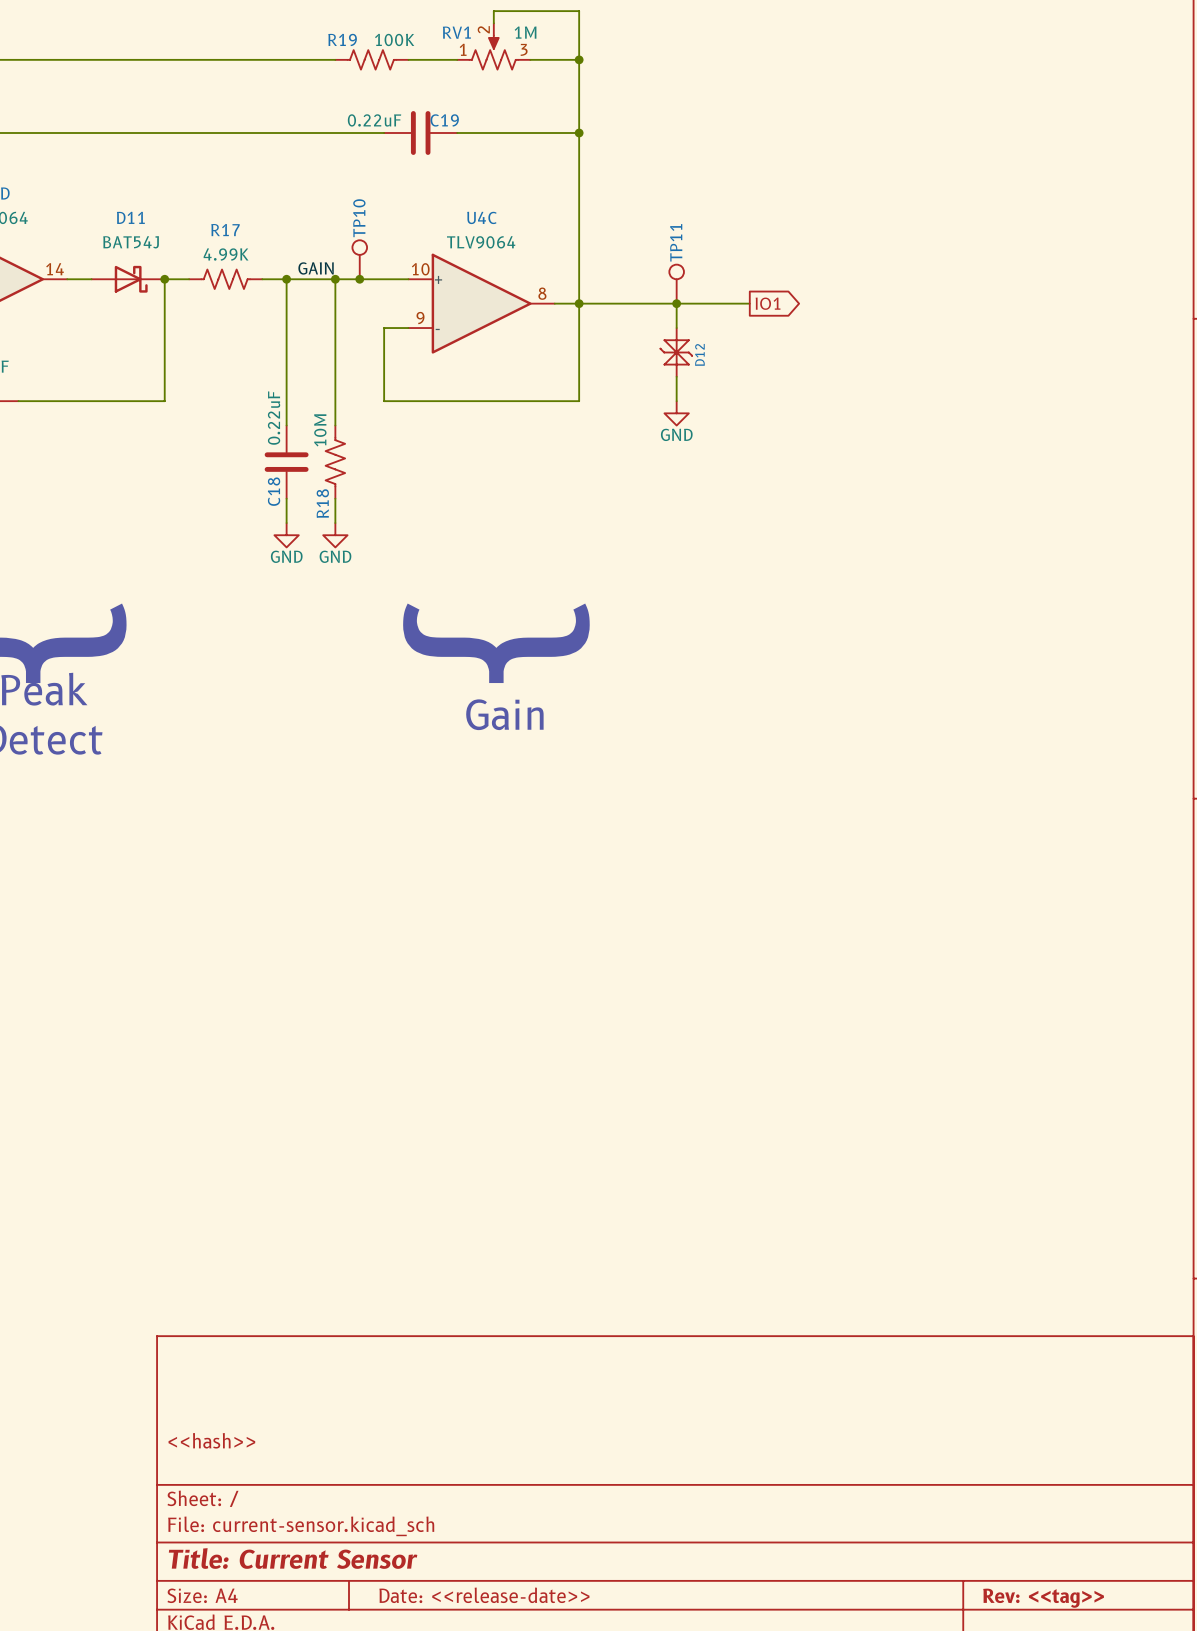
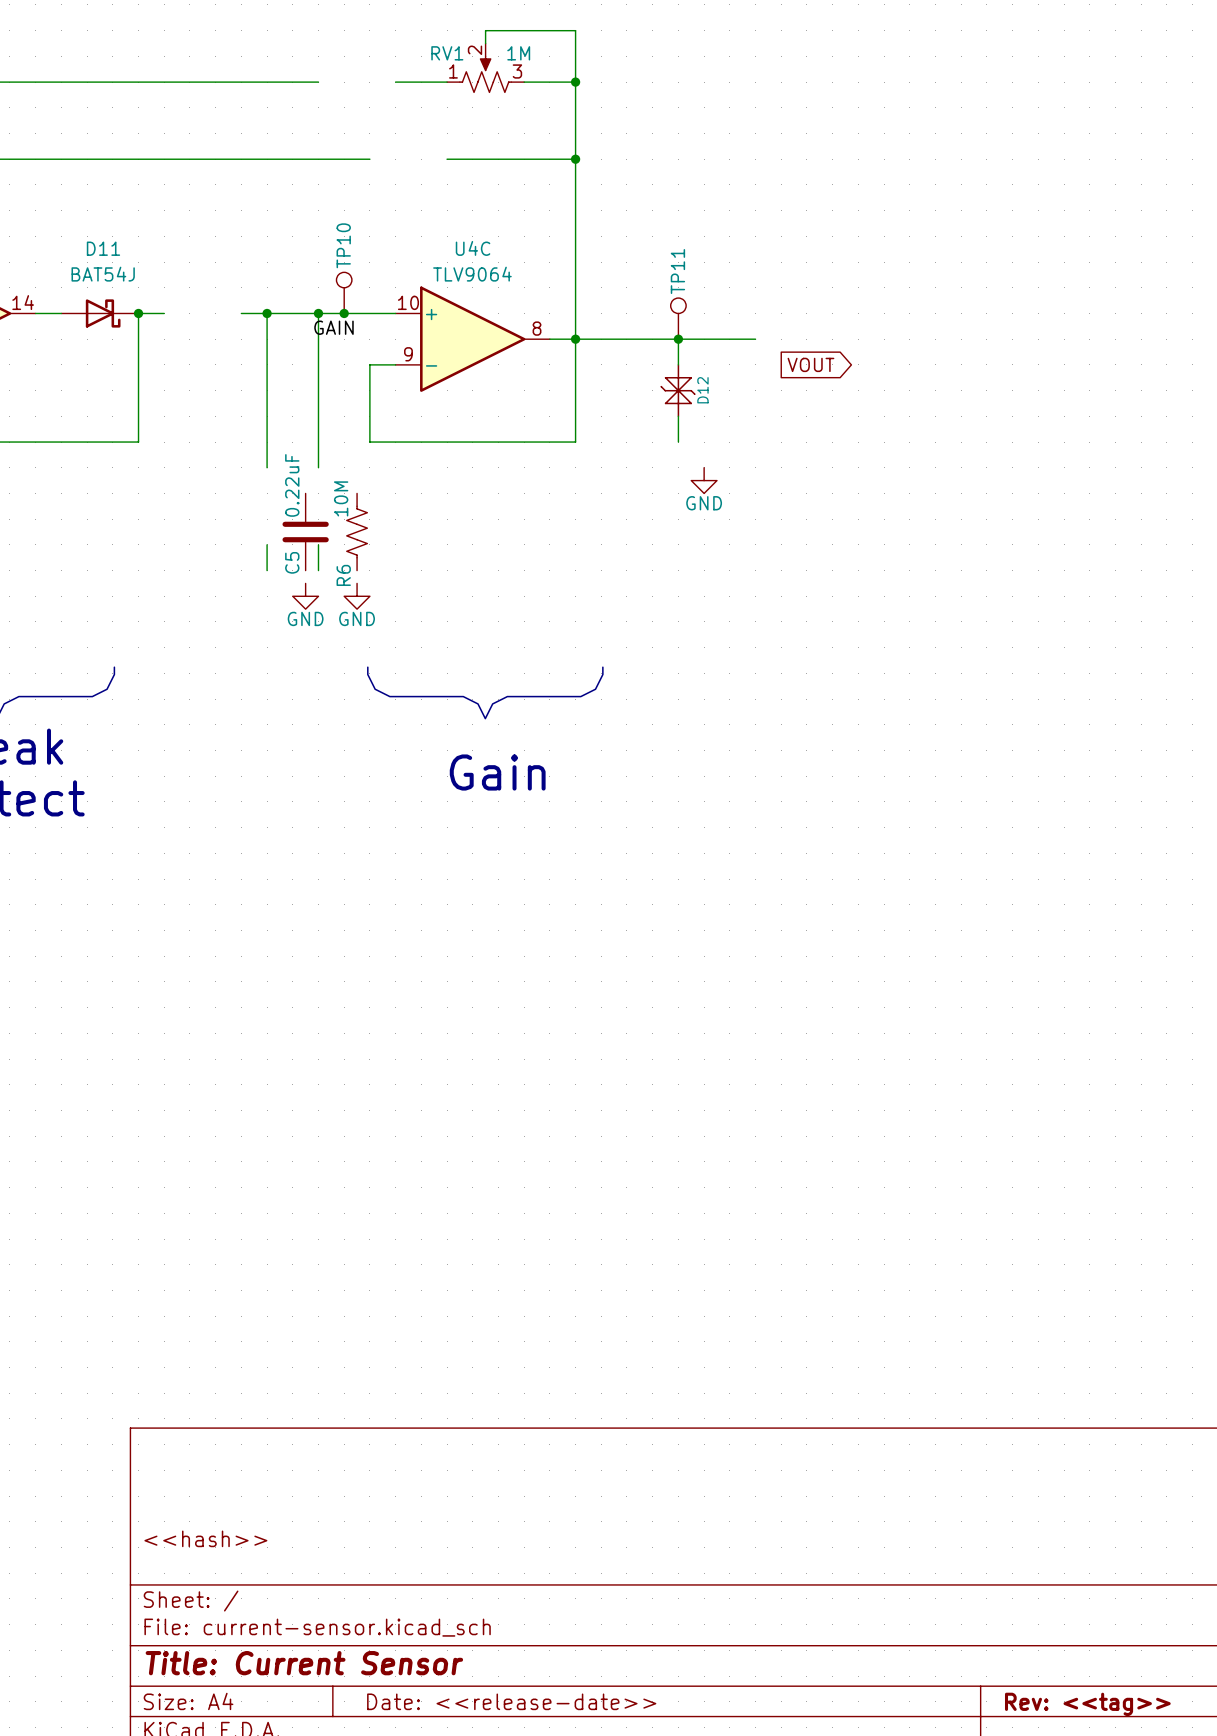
R19: 100K (371, 59) -> none
C19: 0.22uF (420, 133) -> none
label position: GAIN (316, 268) -> GAIN (334, 327)
R17: 4.99K (225, 279) -> none
global label: IO1 (768, 303) -> none
global label: none -> VOUT (810, 364)
power symbol position: GND (676, 413) -> GND (704, 480)
C18: 0.22uF (286, 462) -> none
R18: 10M (335, 462) -> none
C5: none -> 0.22uF (305, 532)
R6: none -> 10M (357, 532)
power symbol: GND (286, 535) -> none
power symbol position: GND (335, 535) -> GND (305, 596)
power symbol: none -> GND (357, 596)

